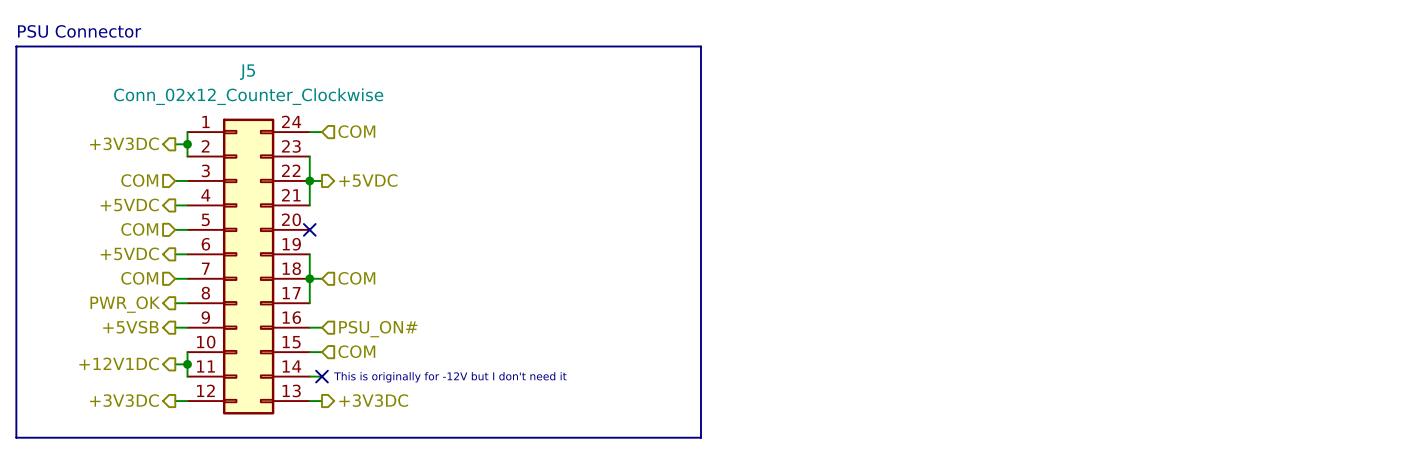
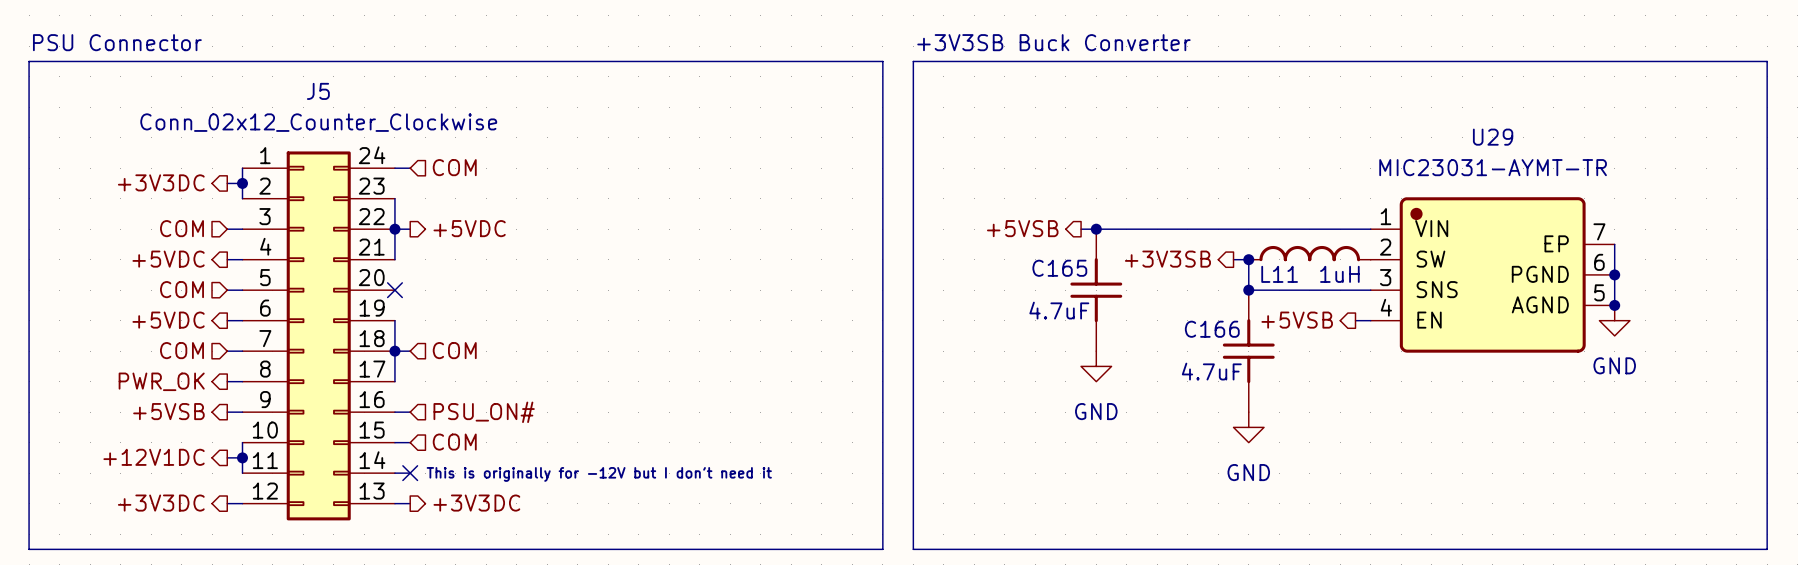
text: none -> +3V3SB Buck Converter (1053, 42)
line: none -> (913, 61) (1767, 61) (1767, 549) (913, 549) (913, 61)
hierarchical label: none -> +5VSB (1022, 228)
wire: none -> (1081, 229) (1370, 229)
junction: none -> (1096, 229)
wire: none -> (1614, 244) (1614, 305)
L11: none -> 1uH (1309, 253)
hierarchical label: none -> +3V3SB (1167, 259)
wire: none -> (1233, 259) (1248, 259) (1248, 290) (1370, 290)
junction: none -> (1248, 259)
U29: none -> MIC23031-AYMT-TR (1492, 274)
junction: none -> (1614, 274)
C165: none -> 4.7uF (1096, 290)
junction: none -> (1248, 290)
junction: none -> (1614, 305)
hierarchical label: none -> +5VSB (1297, 320)
wire: none -> (1355, 320) (1370, 320)
power symbol: none -> GND (1614, 320)
C166: none -> 4.7uF (1248, 351)
power symbol: none -> GND (1096, 366)
power symbol: none -> GND (1248, 427)

